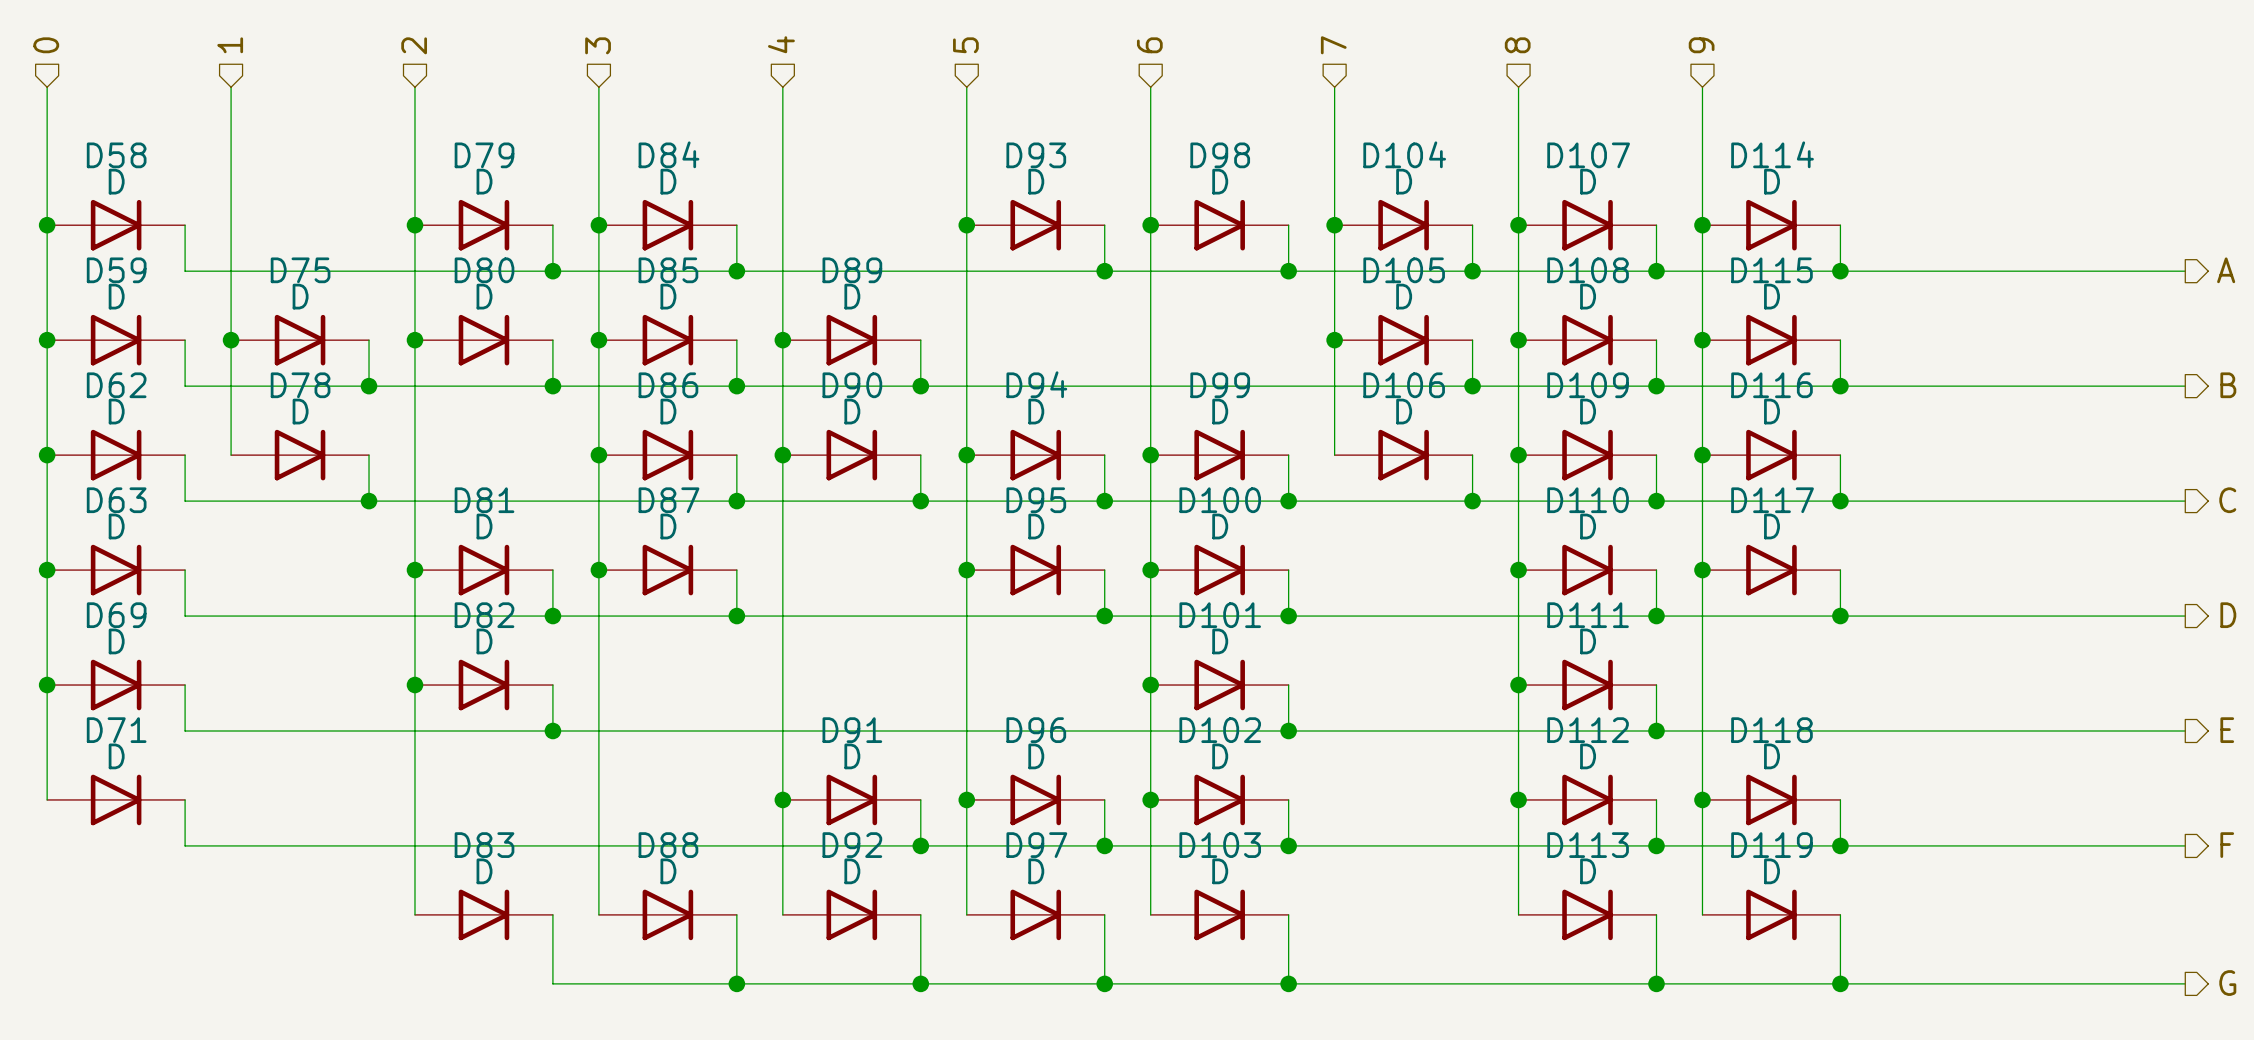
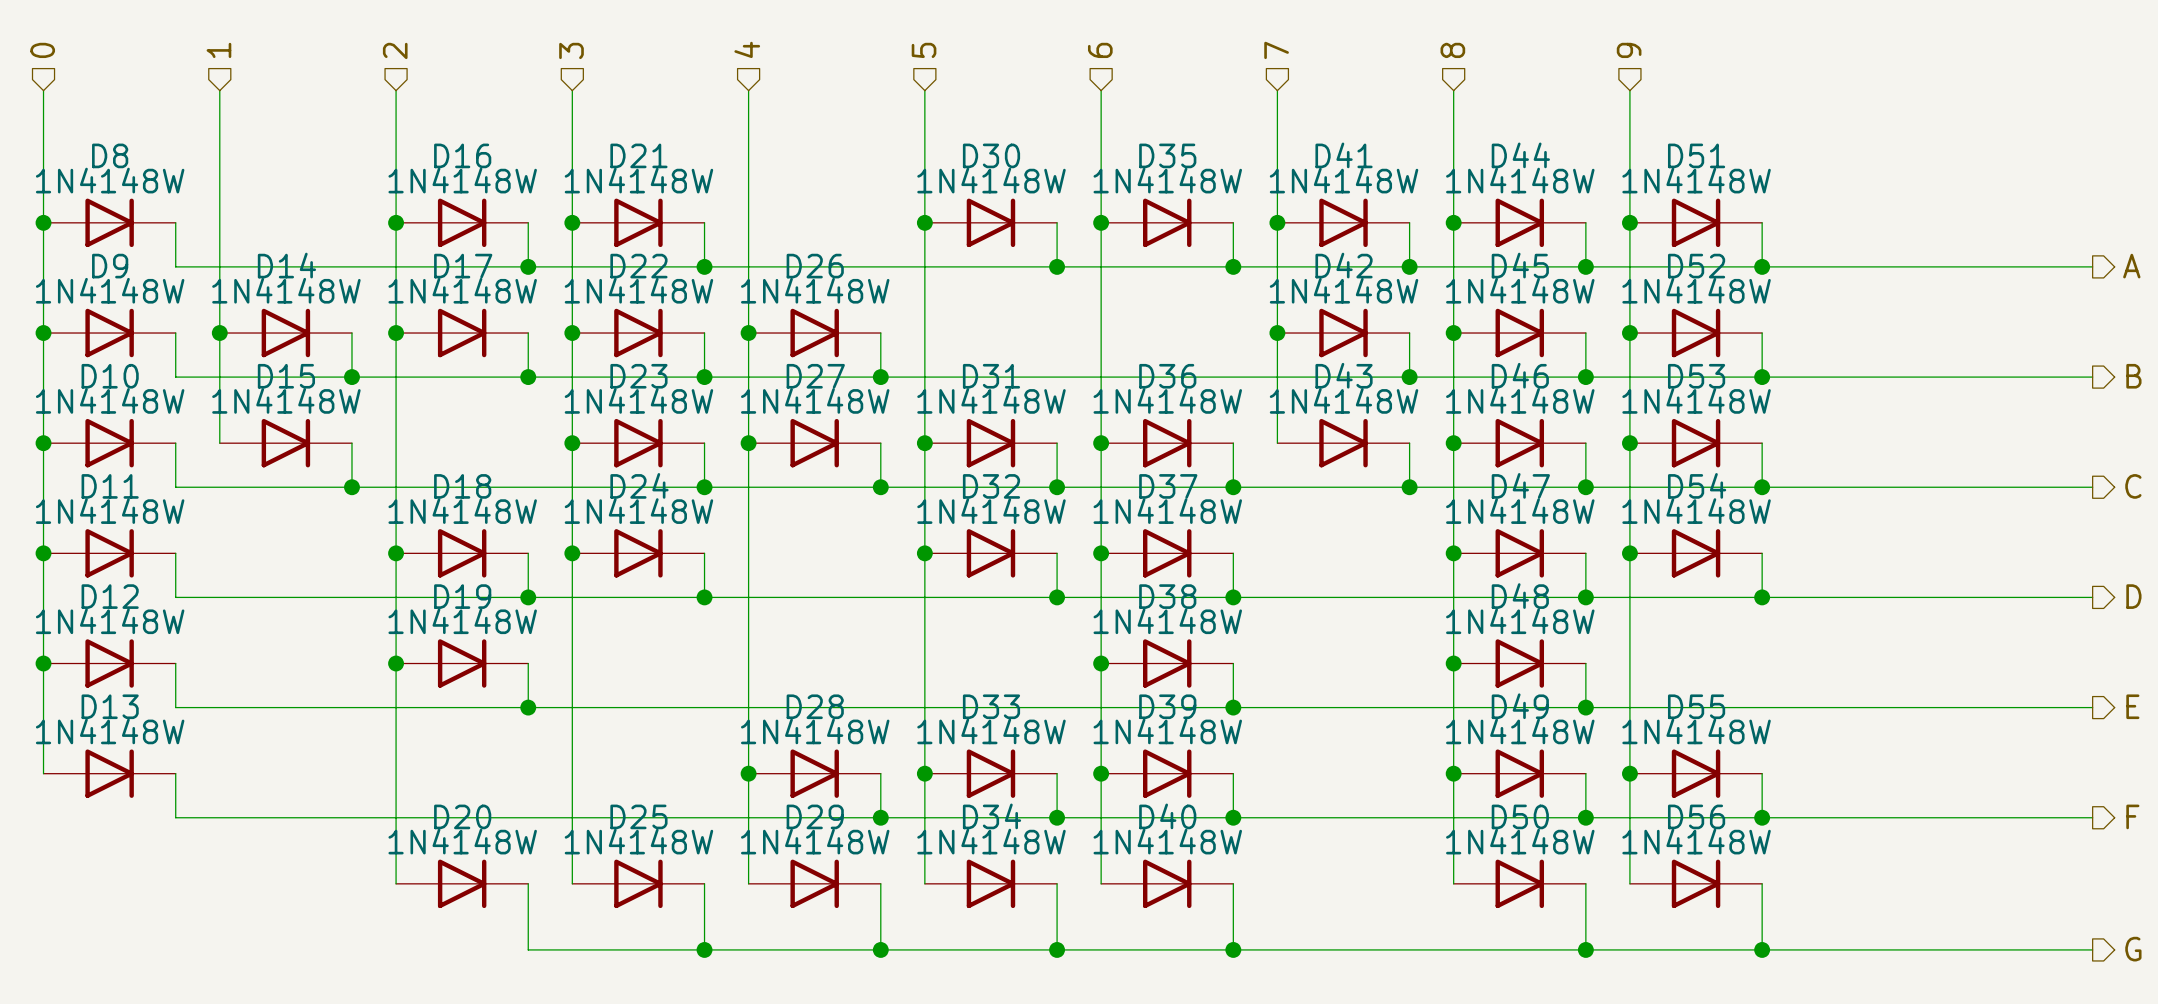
D84 name: D84 (668, 154) -> D21 (638, 155)
D104 name: D104 (1404, 154) -> D41 (1344, 155)
D114 name: D114 (1772, 154) -> D51 (1696, 155)
D58 name: D58 (116, 155) -> D8 (110, 155)
D79 name: D79 (484, 155) -> D16 (462, 155)
D93 name: D93 (1036, 155) -> D30 (991, 155)
D98 name: D98 (1220, 155) -> D35 (1167, 155)
D107 name: D107 (1588, 155) -> D44 (1520, 155)
D58 value: D (116, 181) -> 1N4148W (110, 180)
D79 value: D (484, 181) -> 1N4148W (462, 180)
D84 value: D (668, 181) -> 1N4148W (638, 180)
D93 value: D (1036, 181) -> 1N4148W (991, 180)
D98 value: D (1220, 181) -> 1N4148W (1167, 180)
D104 value: D (1404, 181) -> 1N4148W (1344, 180)
D107 value: D (1588, 181) -> 1N4148W (1520, 180)
D114 value: D (1771, 181) -> 1N4148W (1696, 180)
D59 name: D59 (116, 270) -> D9 (110, 266)
D75 name: D75 (300, 270) -> D14 (286, 265)
D80 name: D80 (484, 270) -> D17 (463, 266)
D85 name: D85 (668, 270) -> D22 (638, 266)
D89 name: D89 (852, 270) -> D26 (815, 266)
D105 name: D105 (1404, 270) -> D42 (1344, 265)
D108 name: D108 (1588, 270) -> D45 (1520, 265)
D115 name: D115 (1771, 270) -> D52 (1696, 266)
D59 value: D (116, 296) -> 1N4148W (110, 290)
D75 value: D (300, 296) -> 1N4148W (286, 290)
D80 value: D (484, 296) -> 1N4148W (462, 290)
D85 value: D (668, 296) -> 1N4148W (638, 290)
D89 value: D (852, 296) -> 1N4148W (815, 290)
D105 value: D (1404, 296) -> 1N4148W (1344, 290)
D108 value: D (1588, 296) -> 1N4148W (1520, 290)
D115 value: D (1771, 296) -> 1N4148W (1696, 290)
D94 name: D94 (1036, 384) -> D31 (991, 376)
D62 name: D62 (116, 385) -> D10 (110, 376)
D78 name: D78 (300, 385) -> D15 (286, 376)
D86 name: D86 (668, 385) -> D23 (638, 376)
D90 name: D90 (852, 385) -> D27 (815, 376)
D99 name: D99 (1220, 385) -> D36 (1167, 376)
D106 name: D106 (1404, 385) -> D43 (1344, 375)
D109 name: D109 (1588, 385) -> D46 (1520, 375)
D116 name: D116 (1771, 385) -> D53 (1696, 376)
D62 value: D (116, 411) -> 1N4148W (110, 400)
D78 value: D (300, 411) -> 1N4148W (286, 400)
D86 value: D (668, 411) -> 1N4148W (638, 400)
D90 value: D (852, 411) -> 1N4148W (815, 400)
D94 value: D (1036, 411) -> 1N4148W (991, 400)
D99 value: D (1220, 411) -> 1N4148W (1167, 400)
D106 value: D (1404, 411) -> 1N4148W (1344, 400)
D109 value: D (1588, 411) -> 1N4148W (1520, 400)
D116 value: D (1771, 411) -> 1N4148W (1696, 400)
D63 name: D63 (116, 500) -> D11 (110, 486)
D81 name: D81 (484, 500) -> D18 (462, 486)
D87 name: D87 (668, 500) -> D24 (639, 485)
D95 name: D95 (1036, 500) -> D32 (991, 486)
D100 name: D100 (1220, 500) -> D37 (1168, 486)
D110 name: D110 (1588, 500) -> D47 (1520, 485)
D117 name: D117 (1772, 500) -> D54 (1697, 485)
D63 value: D (116, 526) -> 1N4148W (110, 511)
D81 value: D (484, 526) -> 1N4148W (462, 511)
D87 value: D (668, 526) -> 1N4148W (638, 511)
D95 value: D (1036, 526) -> 1N4148W (991, 511)
D100 value: D (1220, 526) -> 1N4148W (1167, 511)
D110 value: D (1588, 526) -> 1N4148W (1520, 511)
D117 value: D (1771, 526) -> 1N4148W (1696, 511)
D69 name: D69 (116, 615) -> D12 (110, 596)
D82 name: D82 (484, 615) -> D19 (462, 596)
D101 name: D101 (1220, 615) -> D38 (1167, 596)
D111 name: D111 (1588, 615) -> D48 (1520, 596)
D69 value: D (116, 641) -> 1N4148W (110, 621)
D82 value: D (484, 641) -> 1N4148W (462, 621)
D101 value: D (1220, 641) -> 1N4148W (1167, 621)
D111 value: D (1588, 641) -> 1N4148W (1520, 621)
D71 name: D71 (116, 730) -> D13 (110, 706)
D91 name: D91 (852, 730) -> D28 (815, 706)
D96 name: D96 (1036, 730) -> D33 (991, 706)
D102 name: D102 (1220, 730) -> D39 (1167, 706)
D112 name: D112 (1588, 730) -> D49 (1520, 706)
D118 name: D118 (1771, 730) -> D55 (1696, 706)
D71 value: D (116, 756) -> 1N4148W (110, 731)
D91 value: D (852, 756) -> 1N4148W (815, 731)
D96 value: D (1036, 756) -> 1N4148W (991, 731)
D102 value: D (1220, 756) -> 1N4148W (1167, 731)
D112 value: D (1588, 756) -> 1N4148W (1520, 731)
D118 value: D (1771, 756) -> 1N4148W (1696, 731)
D83 name: D83 (484, 845) -> D20 (462, 816)
D88 name: D88 (668, 845) -> D25 (638, 816)
D92 name: D92 (852, 845) -> D29 (815, 816)
D97 name: D97 (1036, 845) -> D34 (992, 816)
D103 name: D103 (1220, 845) -> D40 (1167, 816)
D113 name: D113 (1588, 845) -> D50 (1520, 816)
D119 name: D119 (1771, 845) -> D56 (1696, 816)
D83 value: D (484, 871) -> 1N4148W (462, 841)
D88 value: D (668, 871) -> 1N4148W (638, 841)
D92 value: D (852, 871) -> 1N4148W (815, 841)
D97 value: D (1036, 871) -> 1N4148W (991, 841)
D103 value: D (1220, 871) -> 1N4148W (1167, 841)
D113 value: D (1588, 871) -> 1N4148W (1520, 841)
D119 value: D (1771, 871) -> 1N4148W (1696, 841)

